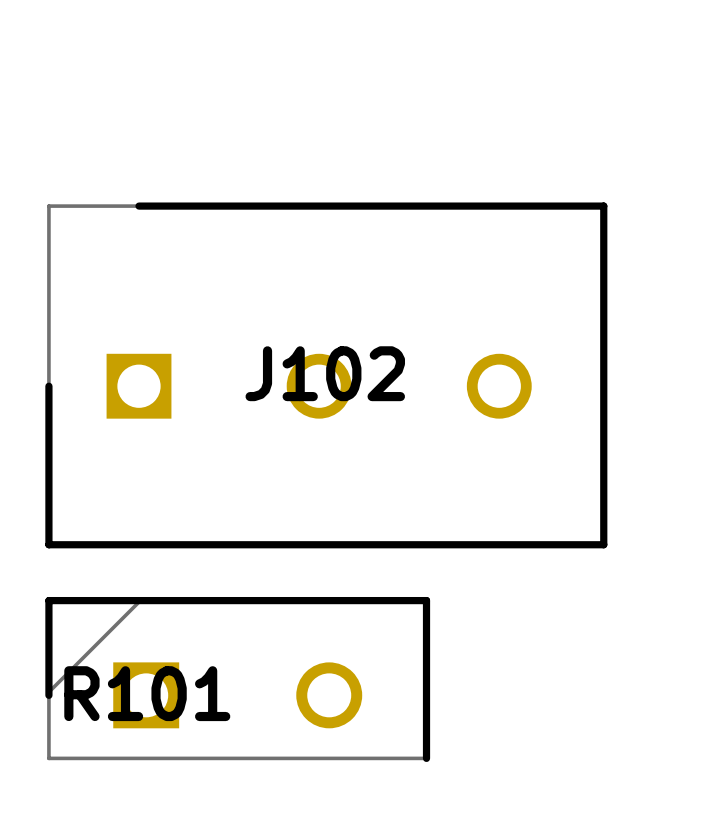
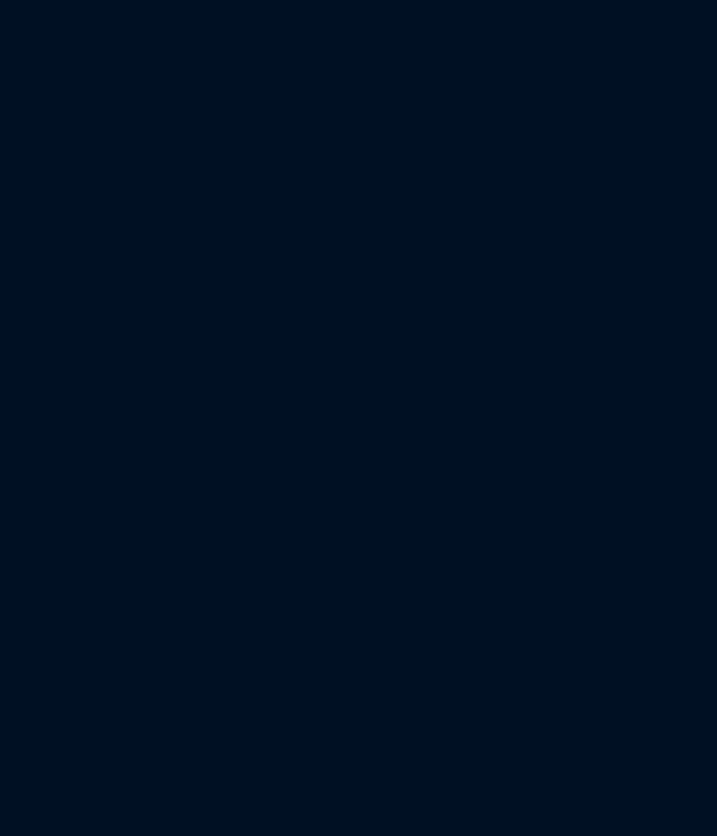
J102: (326, 375) -> none
R101: (237, 679) -> none

